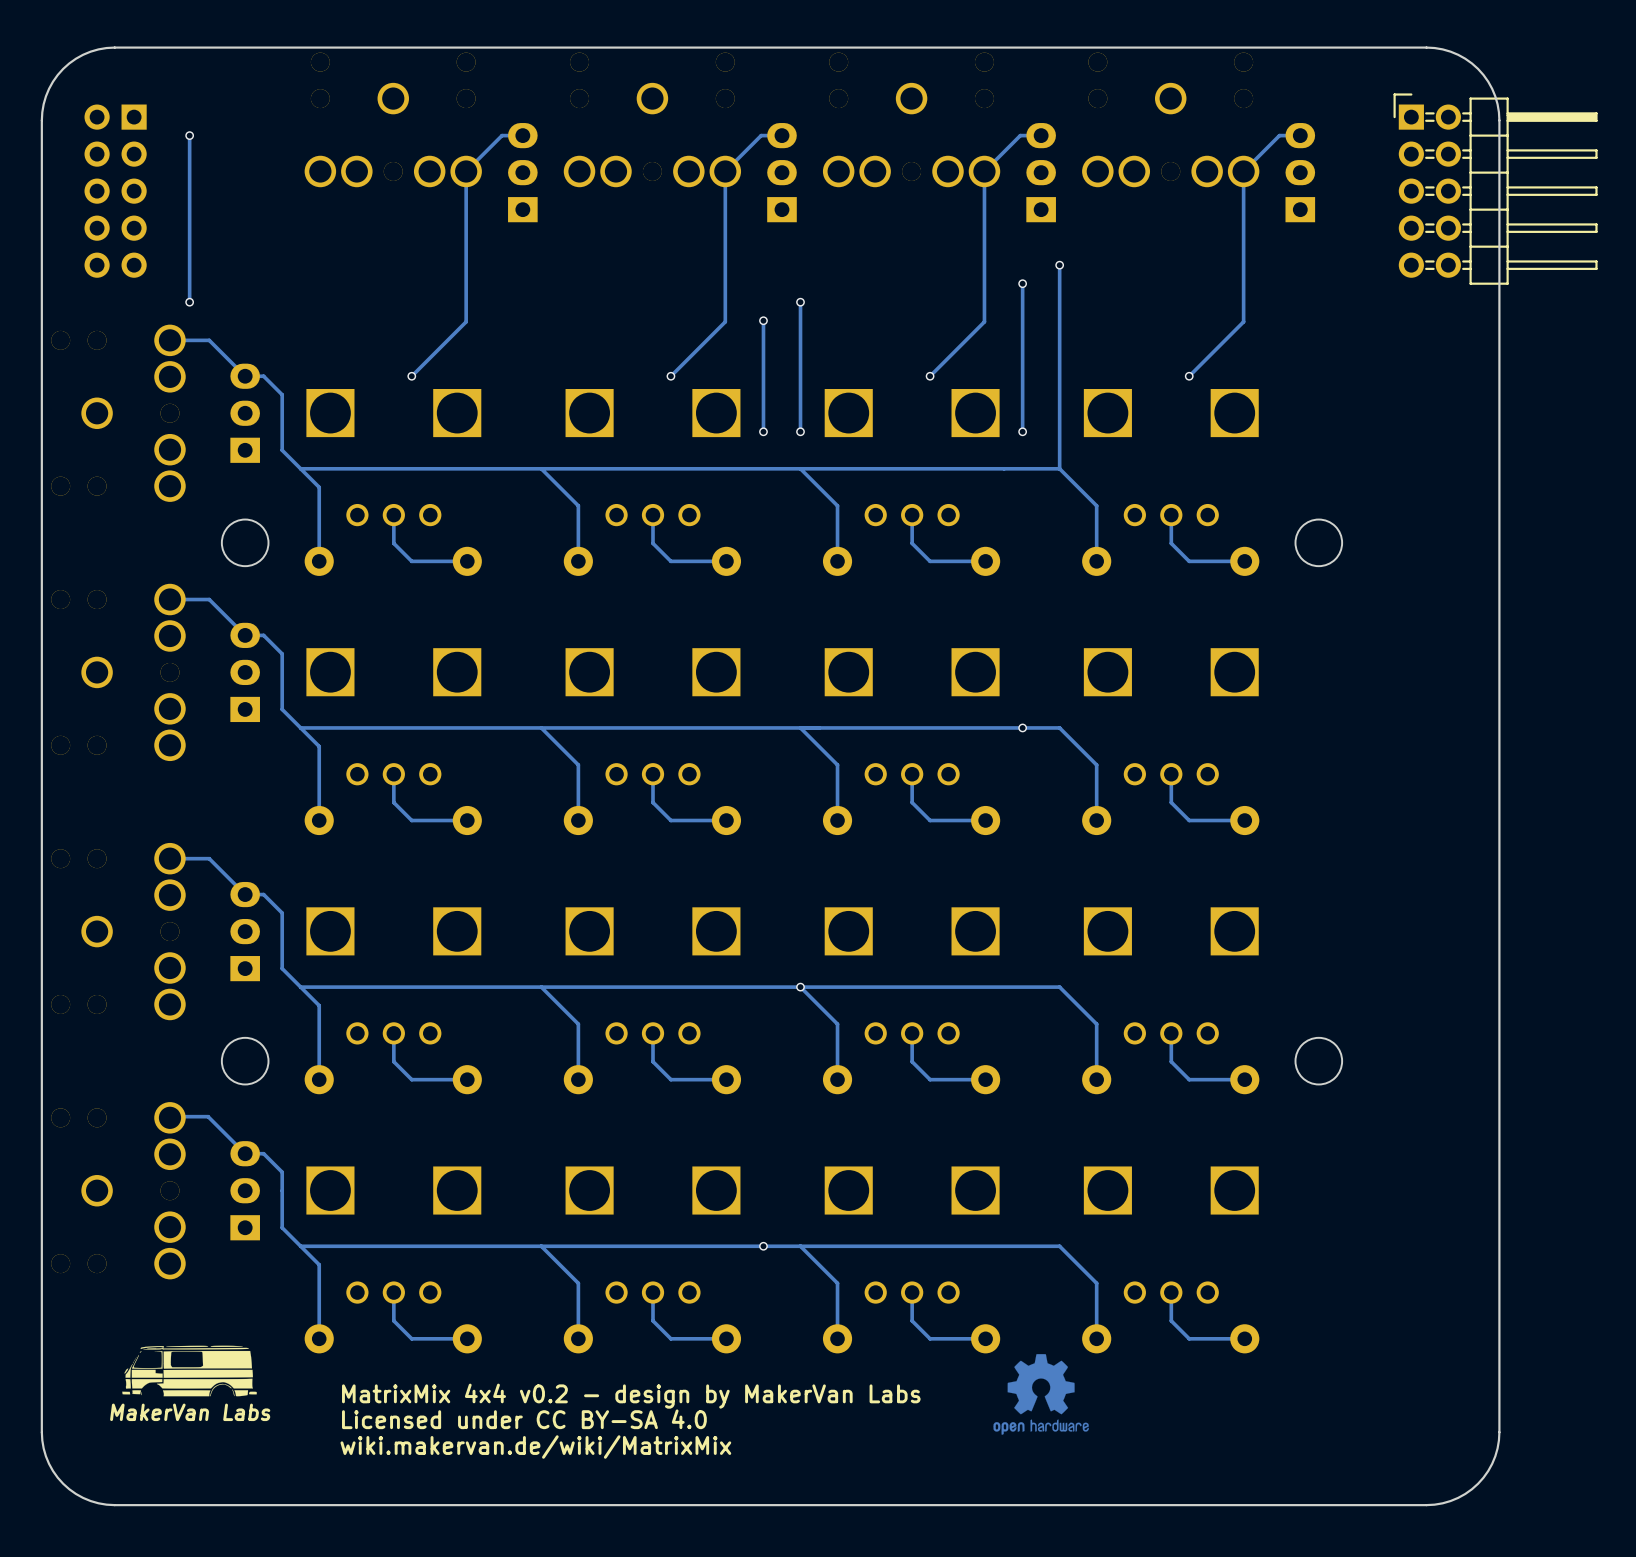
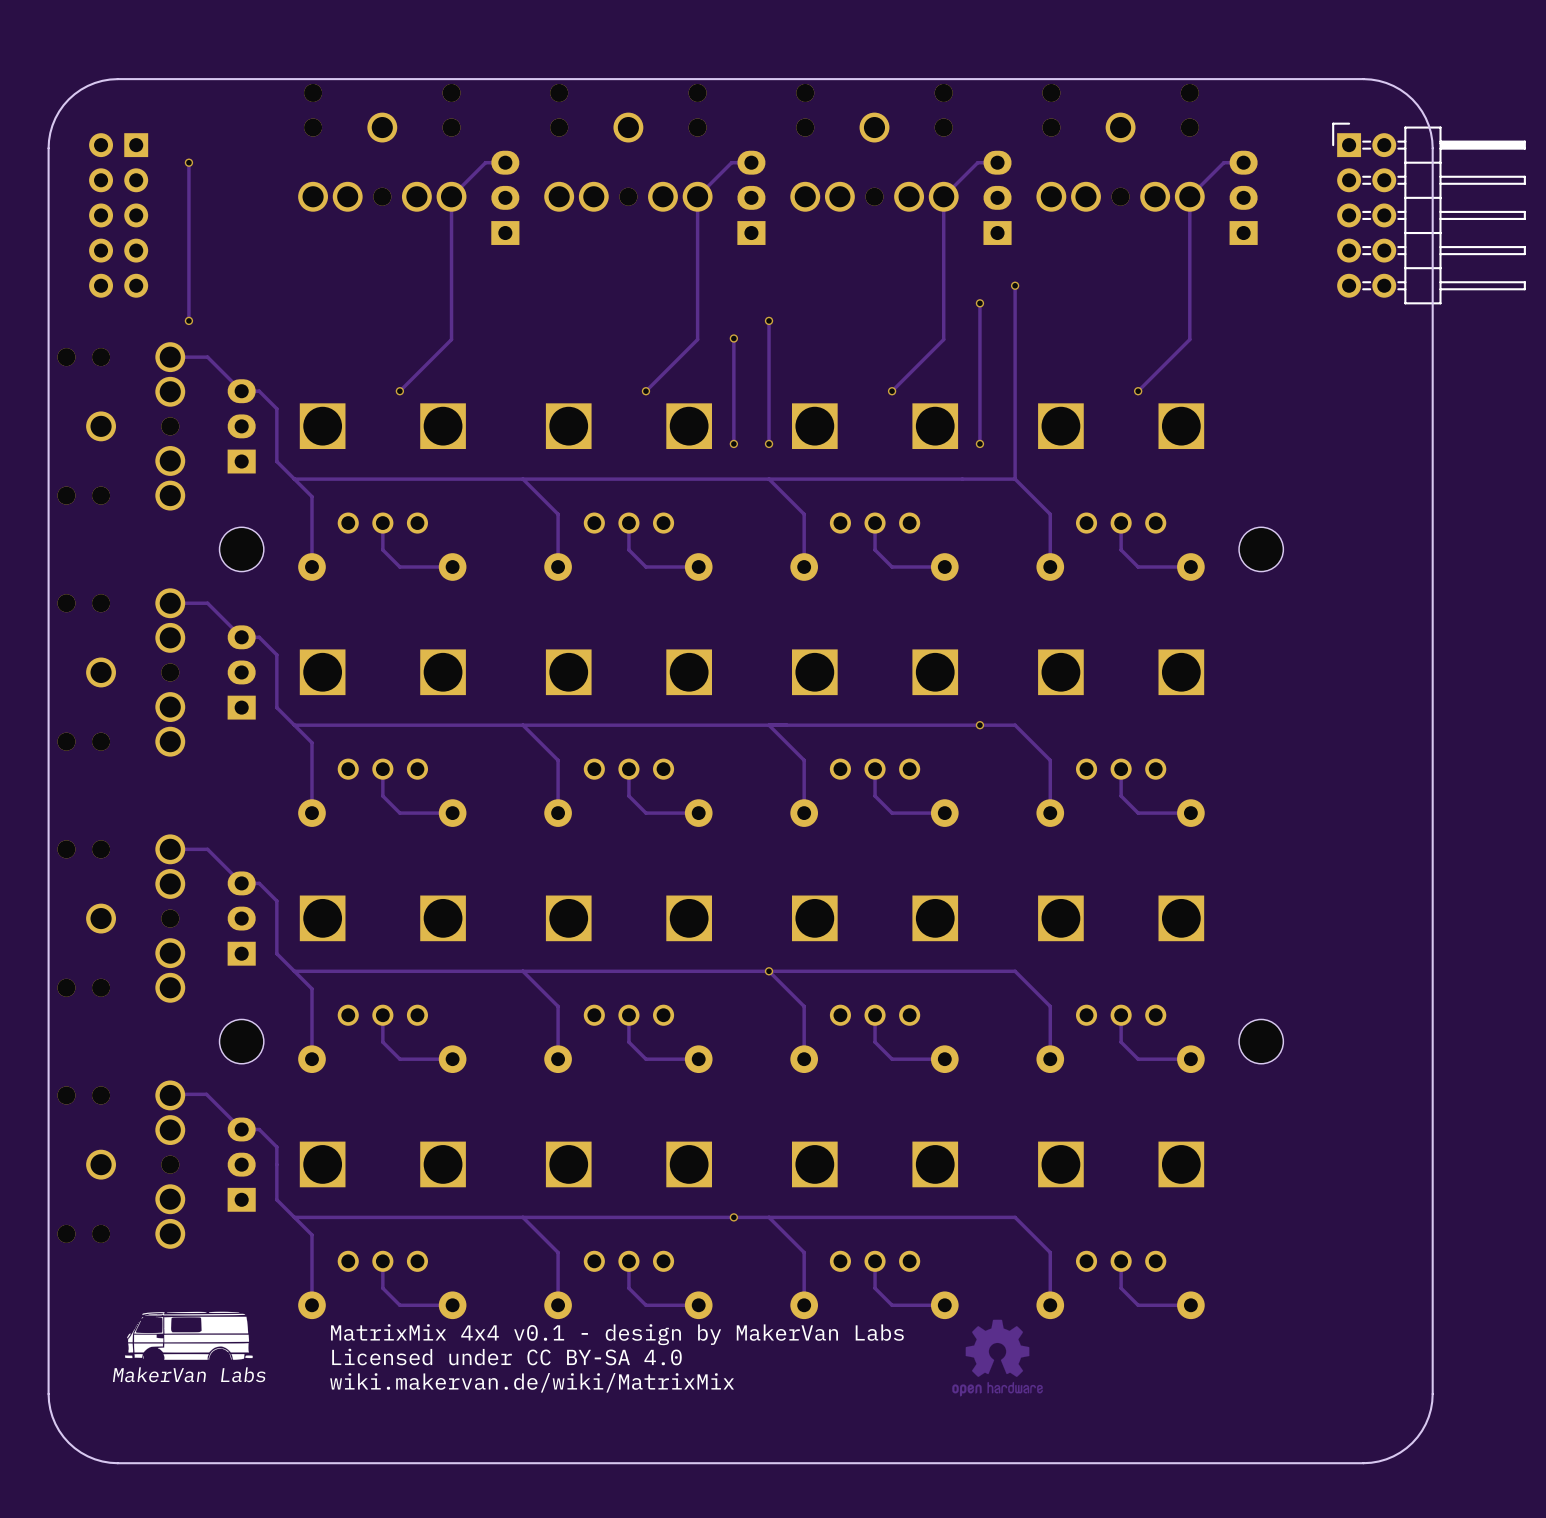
text: none -> MatrixMix 4x4 v0.1 - design by MakerVan Labs (617, 1334)
text: MatrixMix 4x4 v0.2 - design by MakerVan Labs (631, 1396) -> Licensed under CC BY-SA 4.0 (506, 1357)
text: Licensed under CC BY-SA 4.0 (524, 1419) -> wiki.makervan.de/wiki/MatrixMix (532, 1382)
text: wiki.makervan.de/wiki/MatrixMix (535, 1447) -> none

